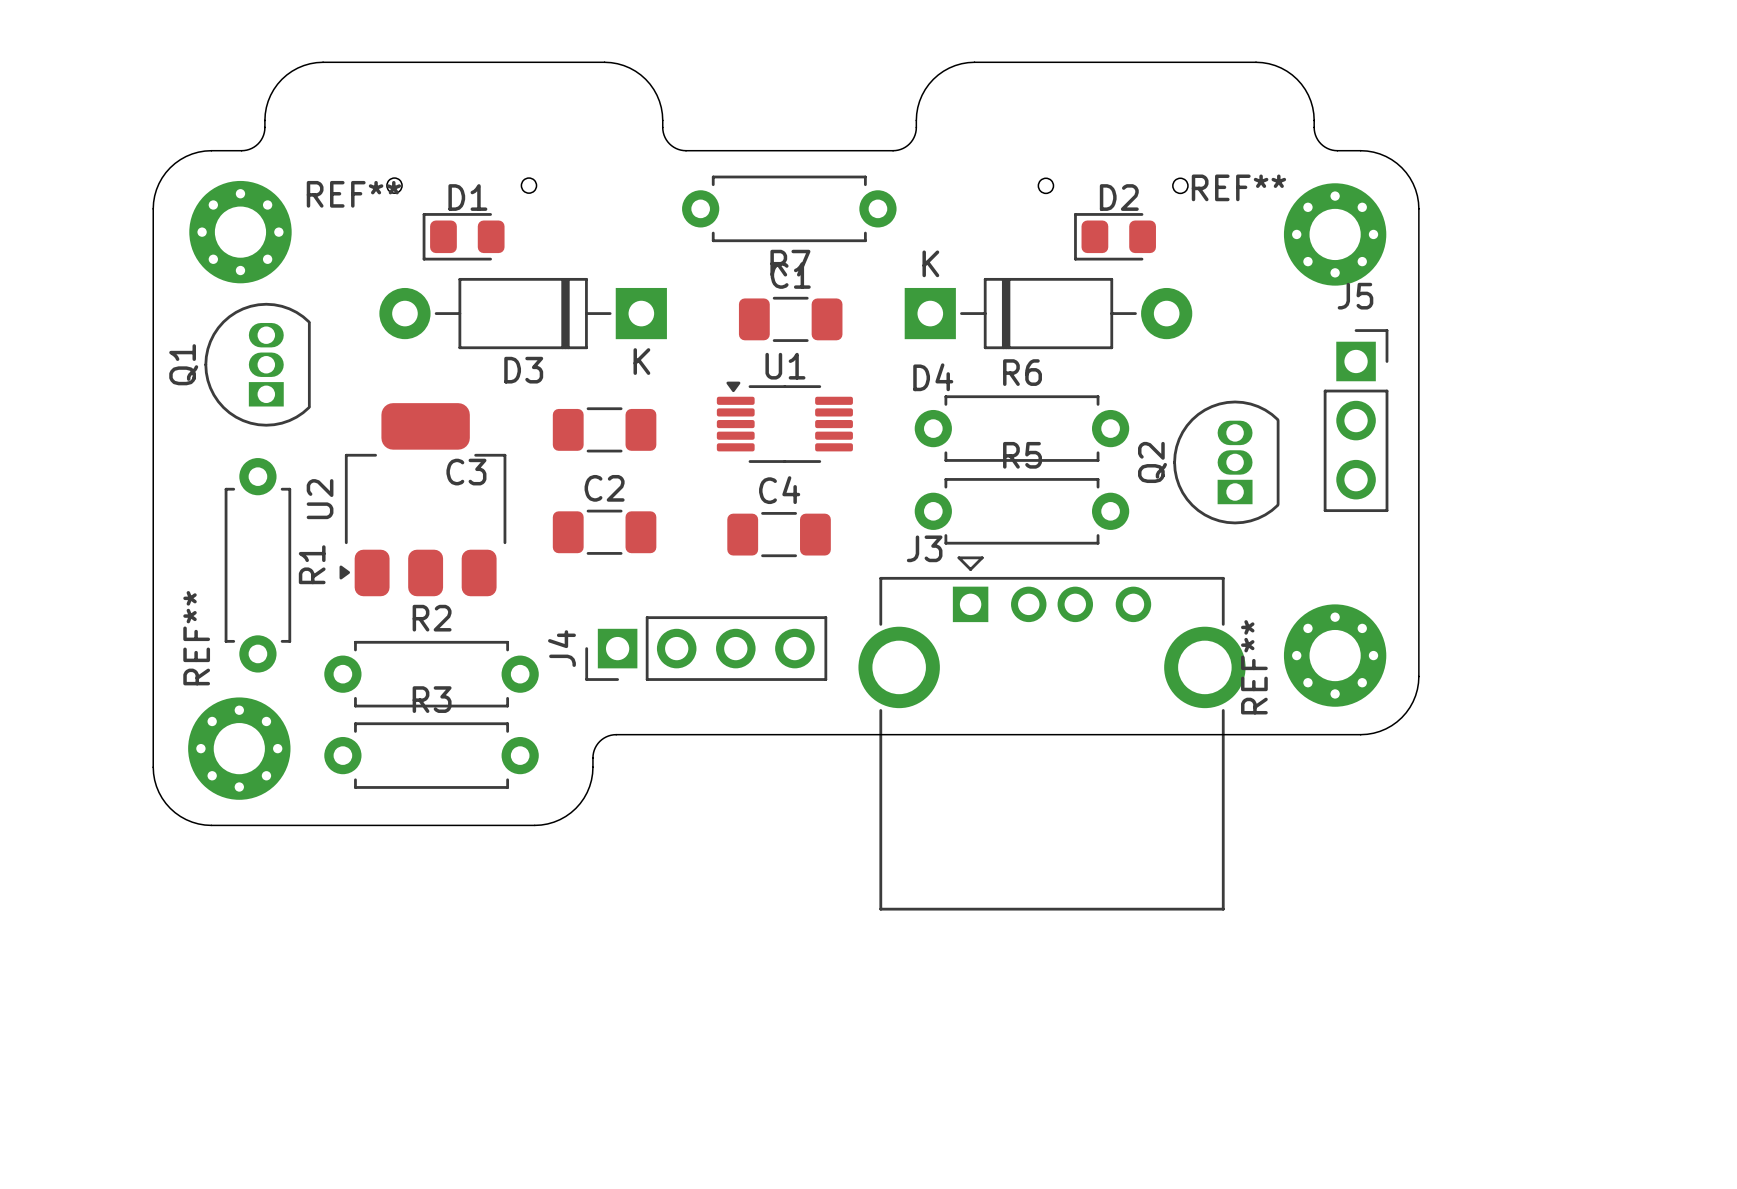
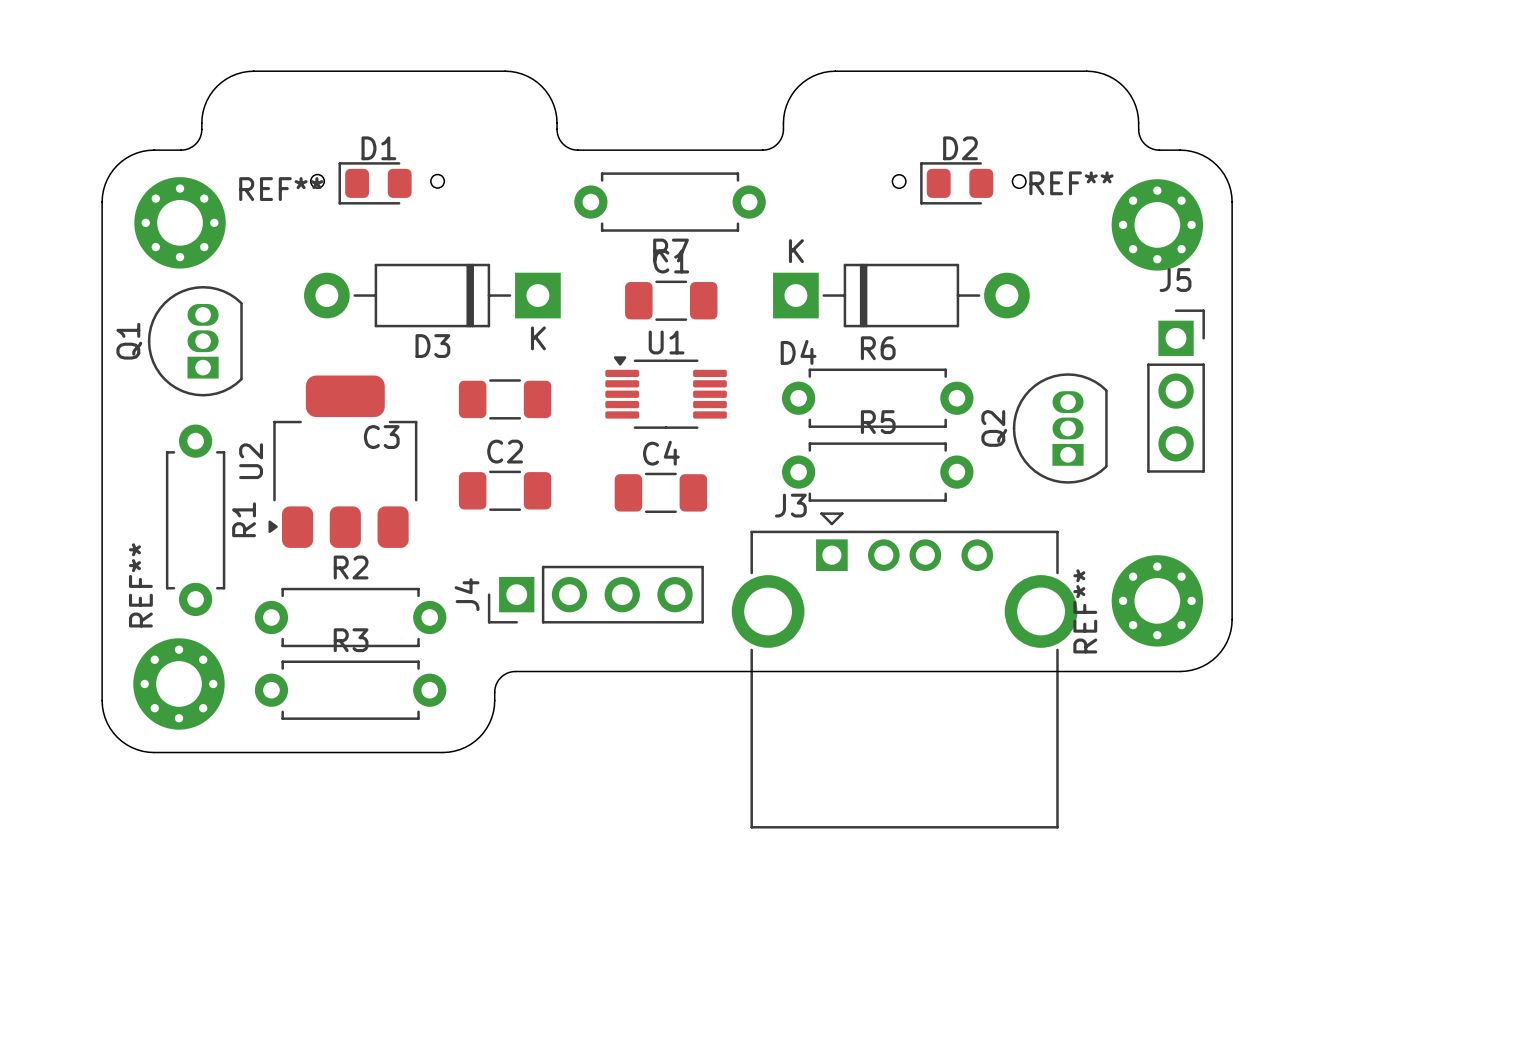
D1 position: (463, 236) -> (375, 183)
D2 position: (1115, 236) -> (956, 183)

